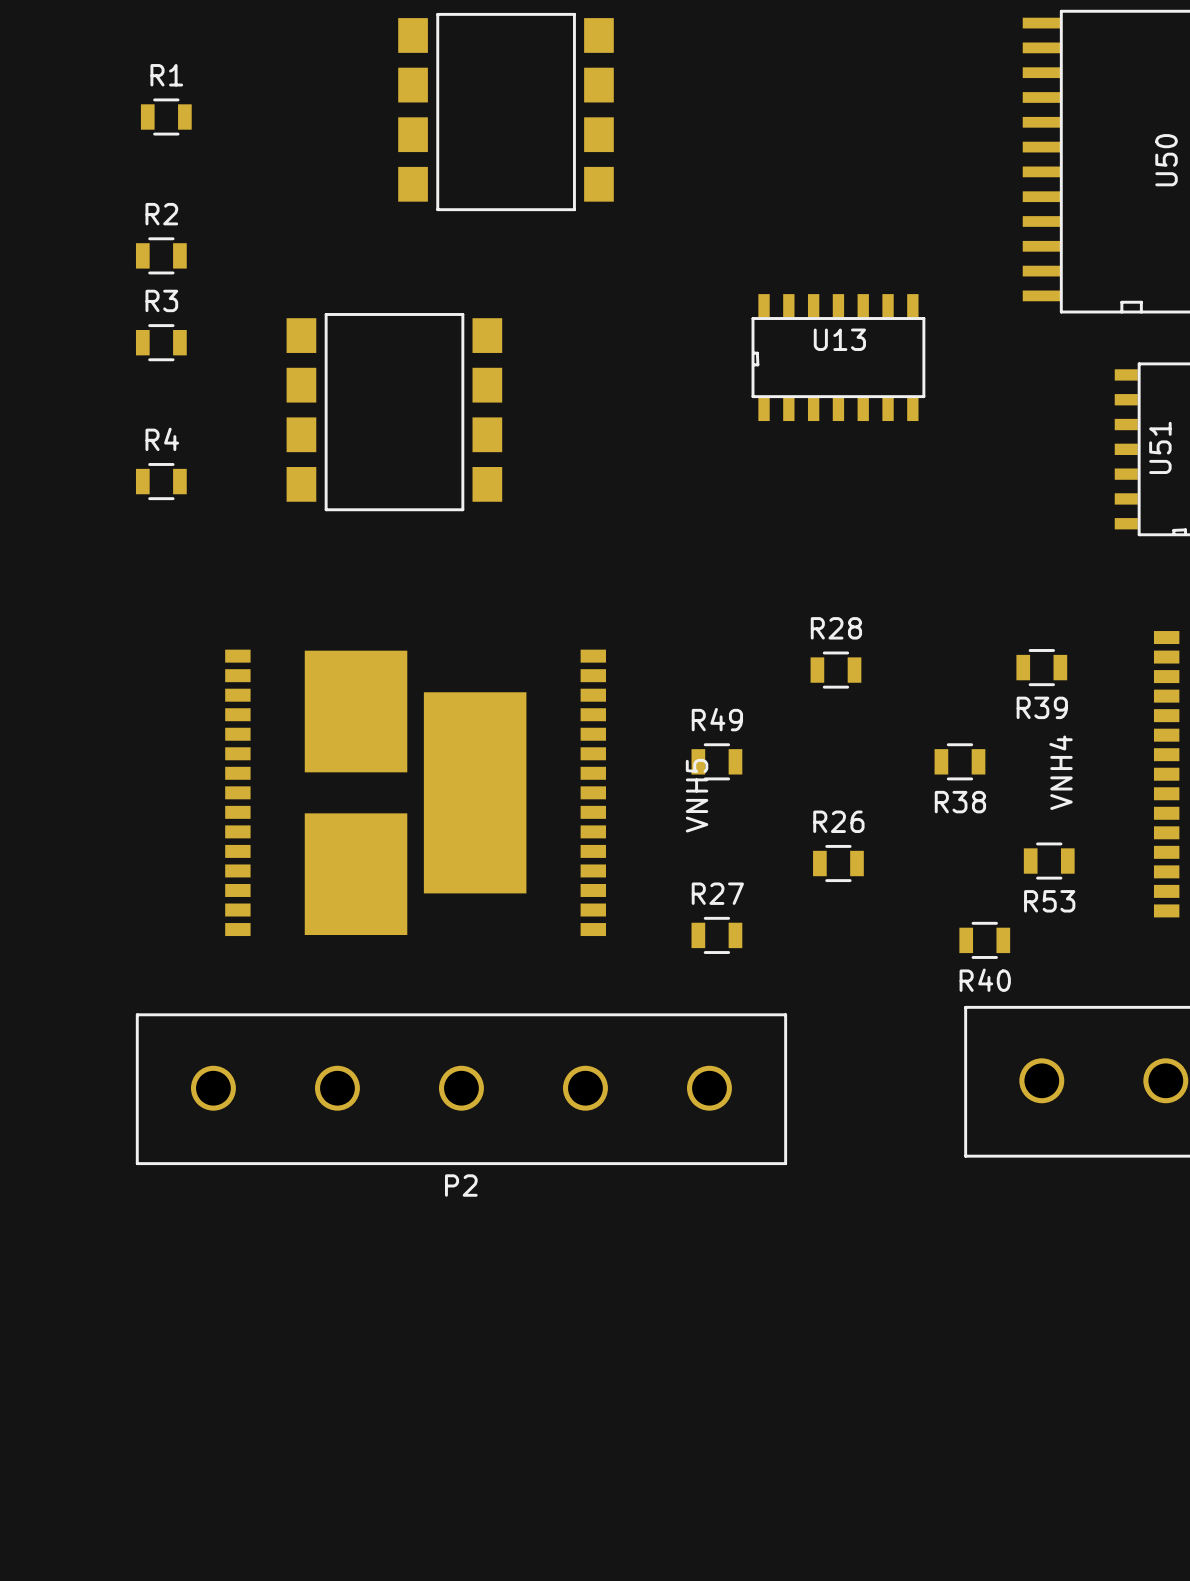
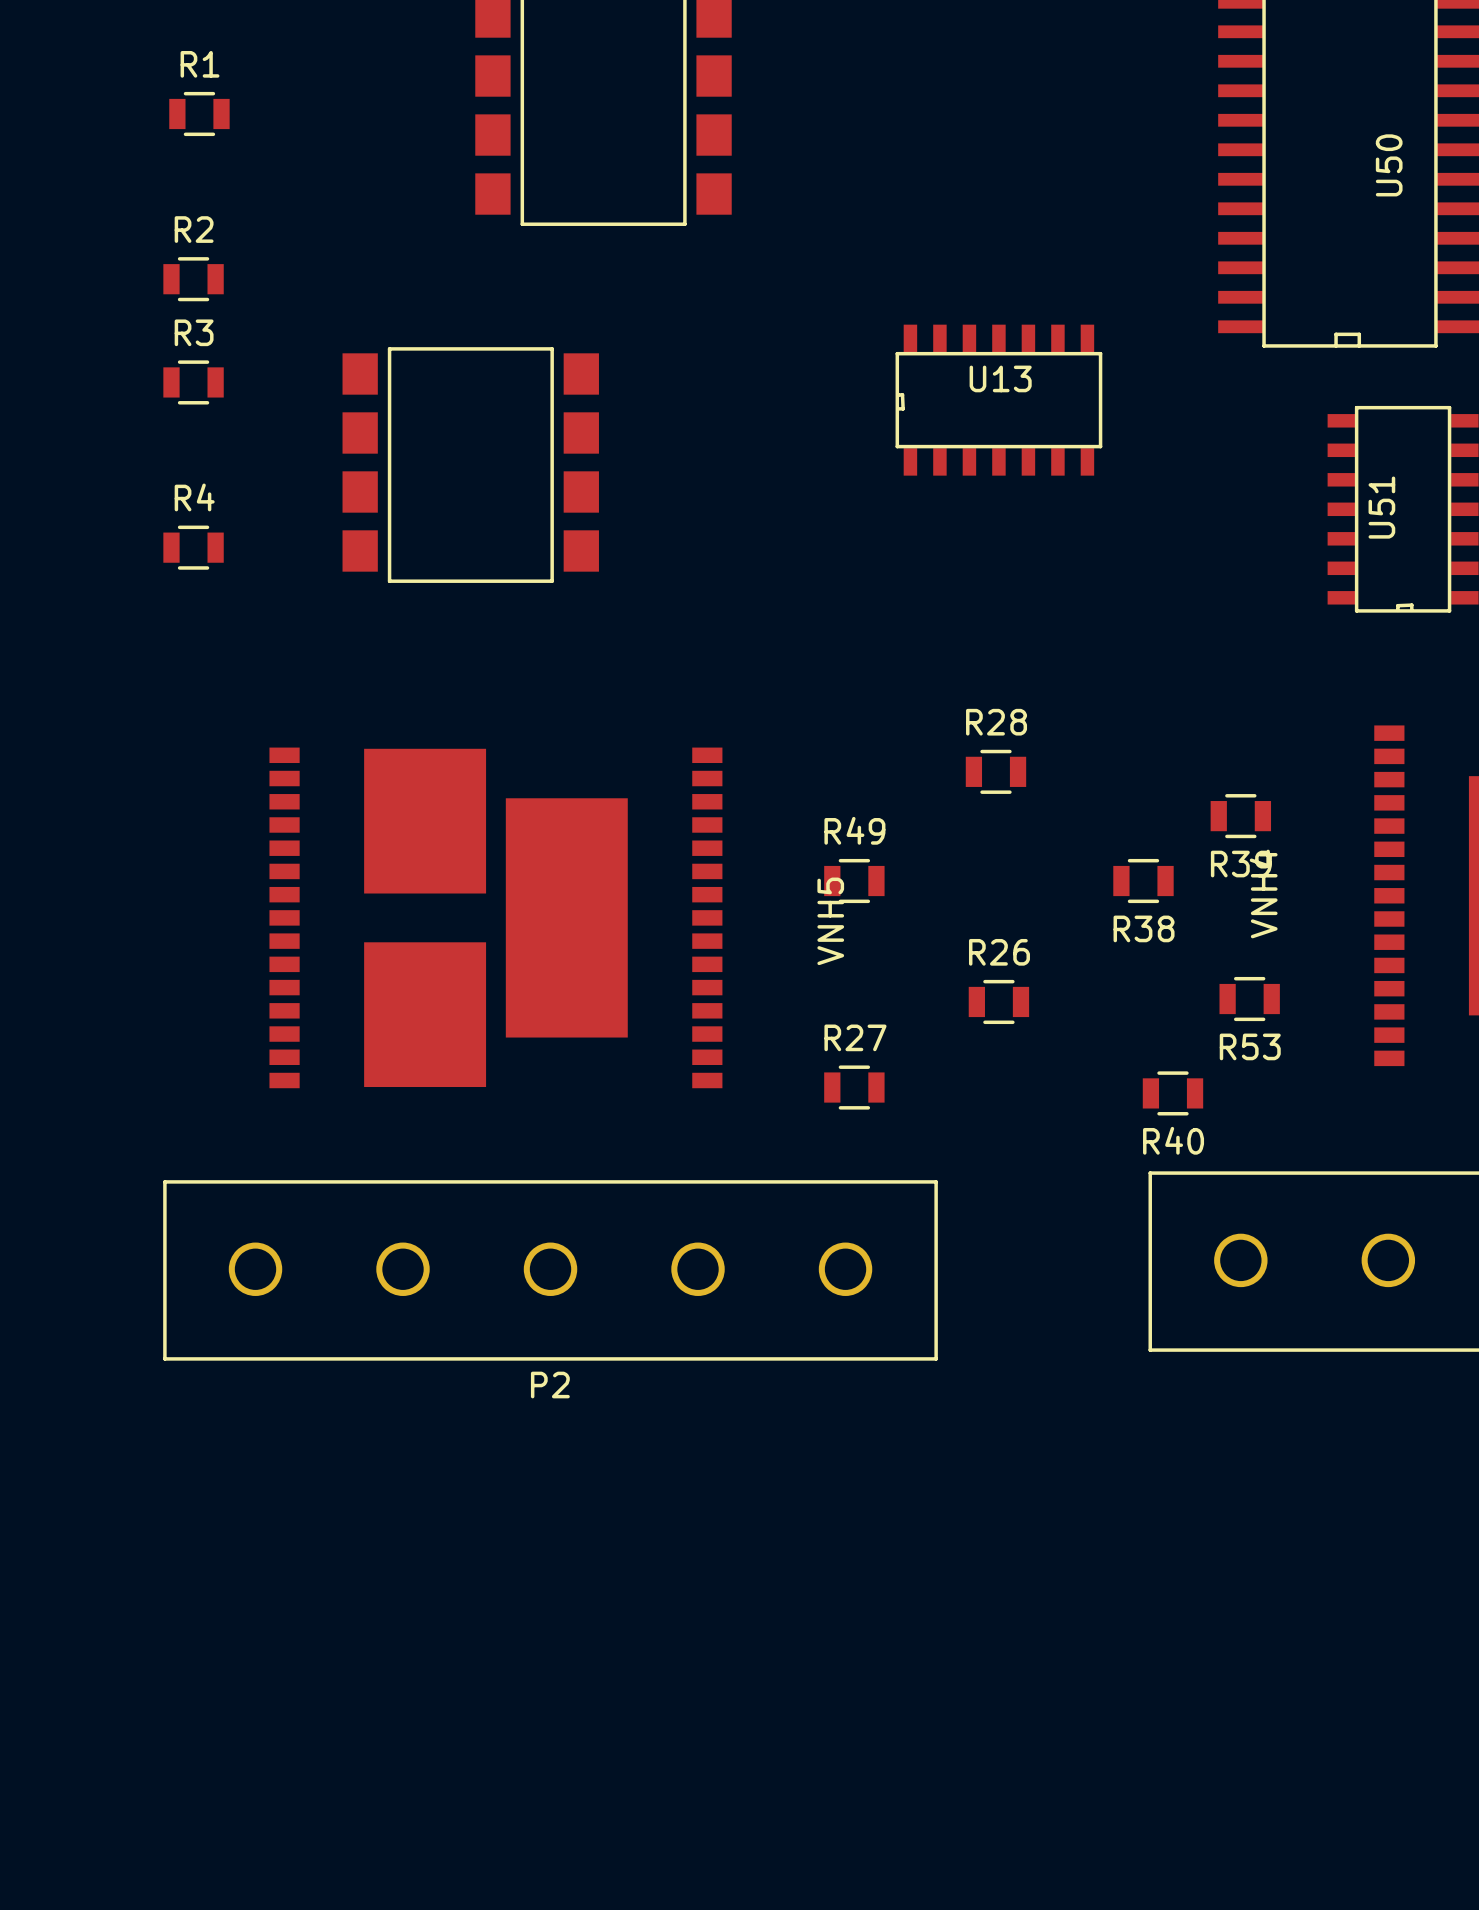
R39 position: (1041, 667) -> (1240, 816)

